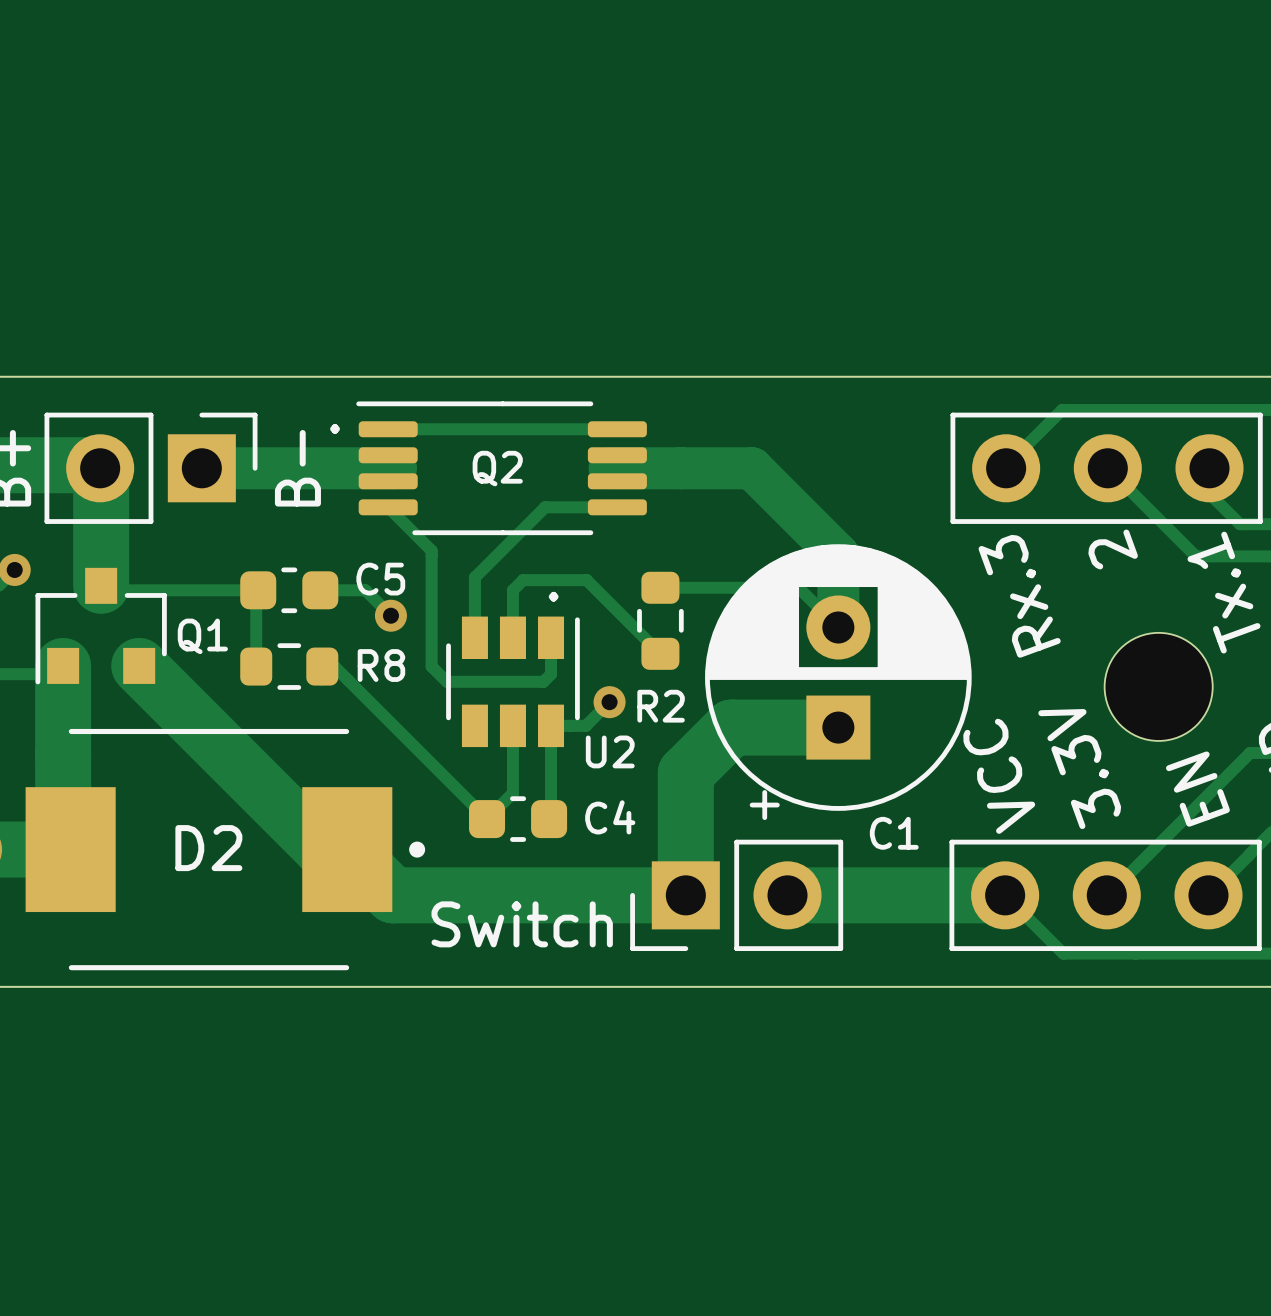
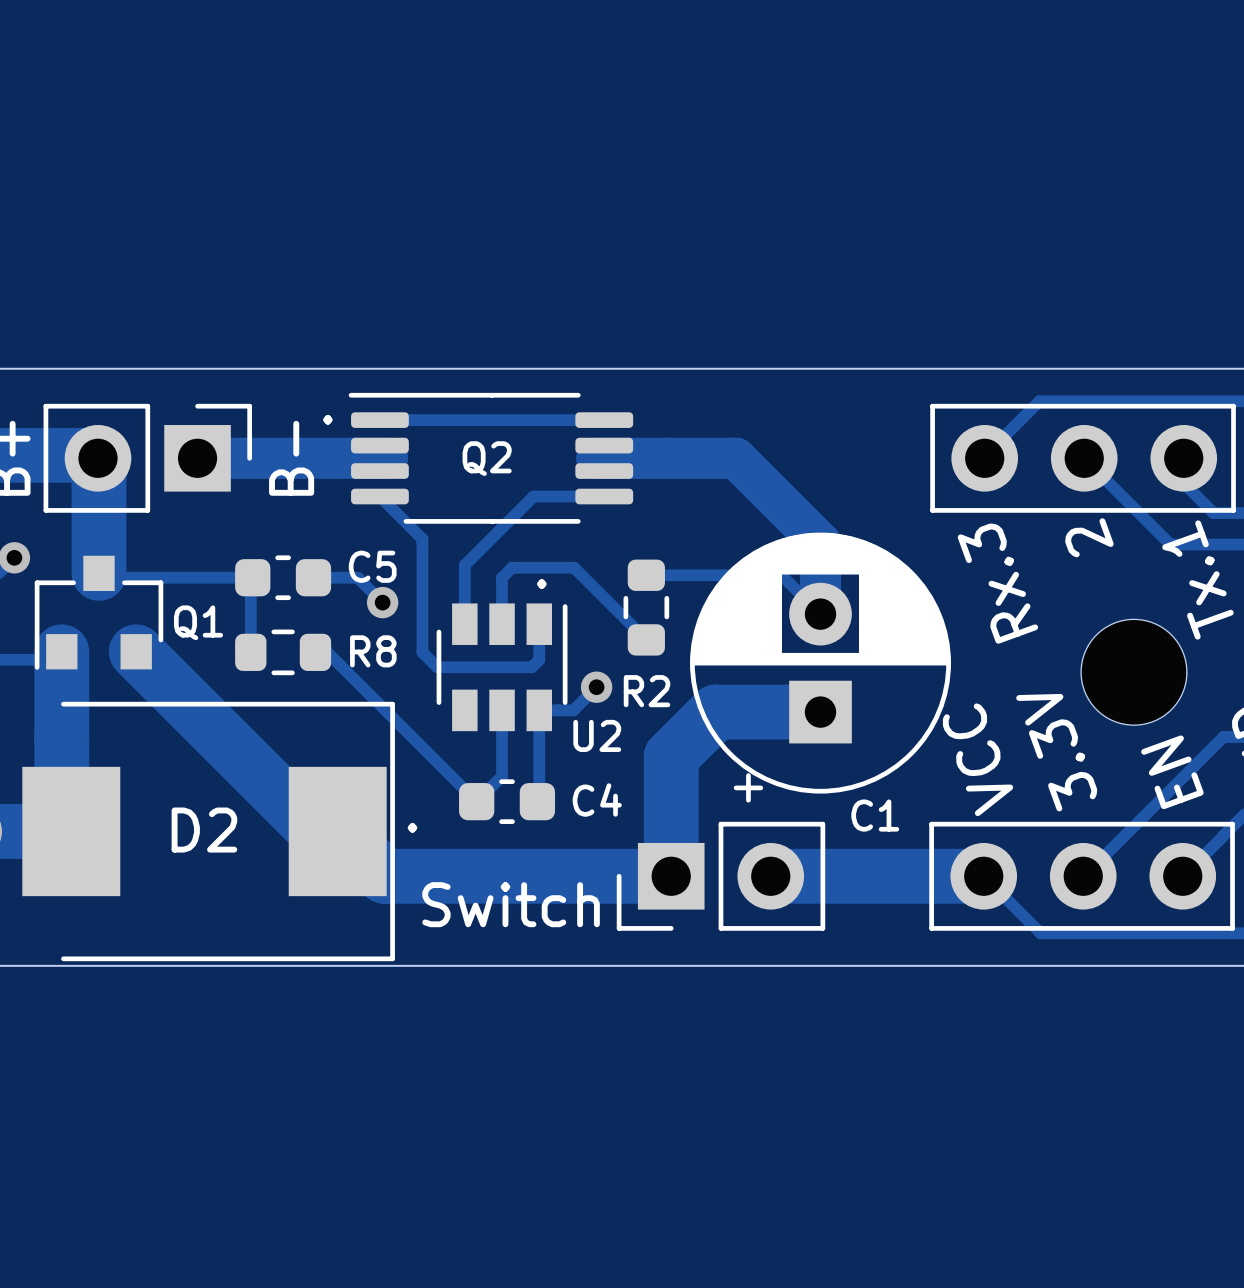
D2 footprint: [25, 728, 426, 971] -> [22, 701, 395, 962]
text: none -> . (412, 827)

